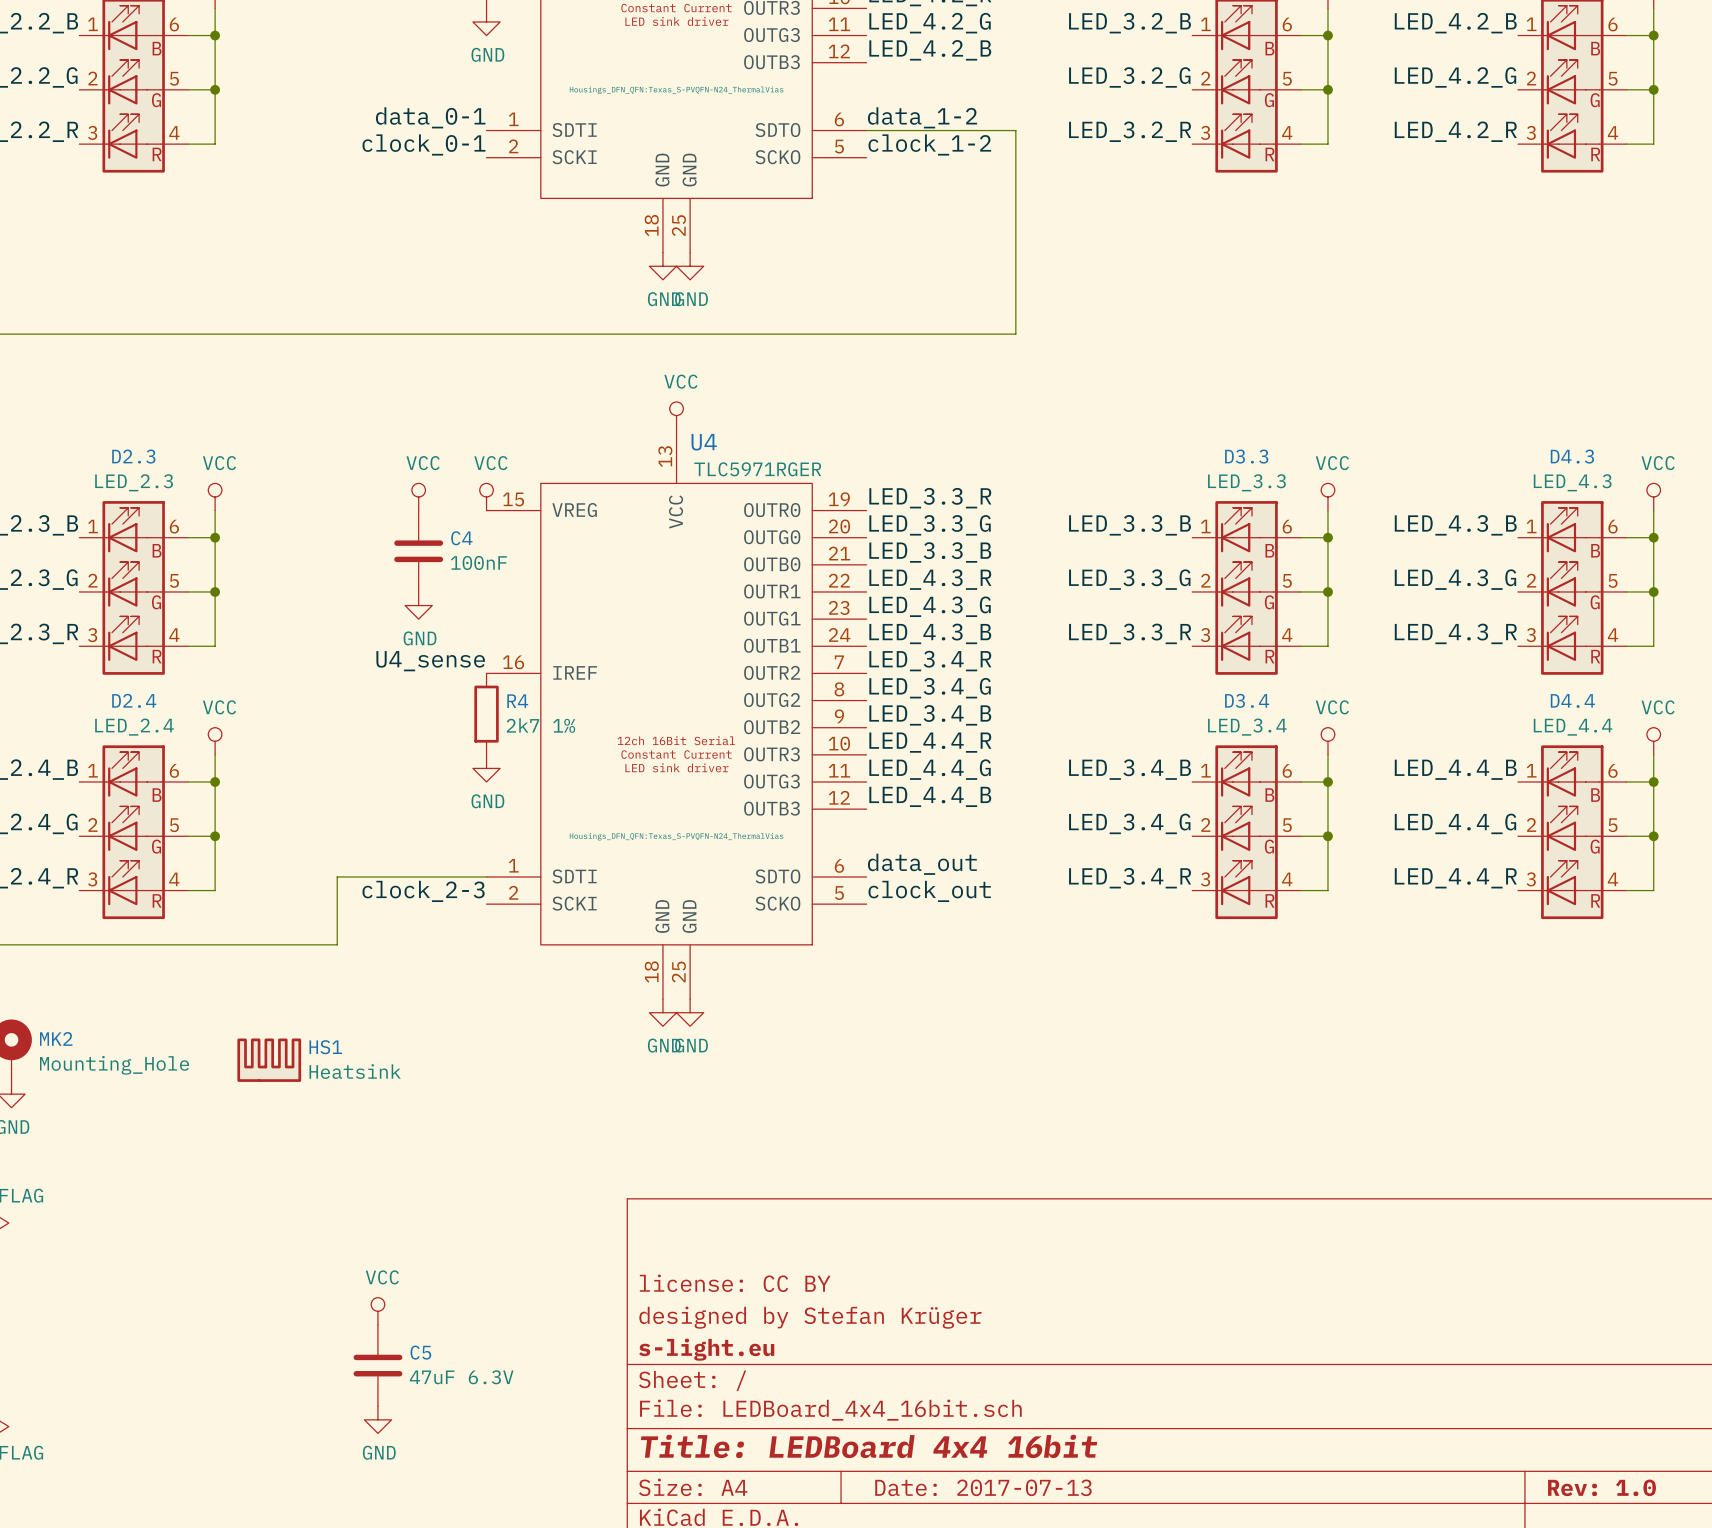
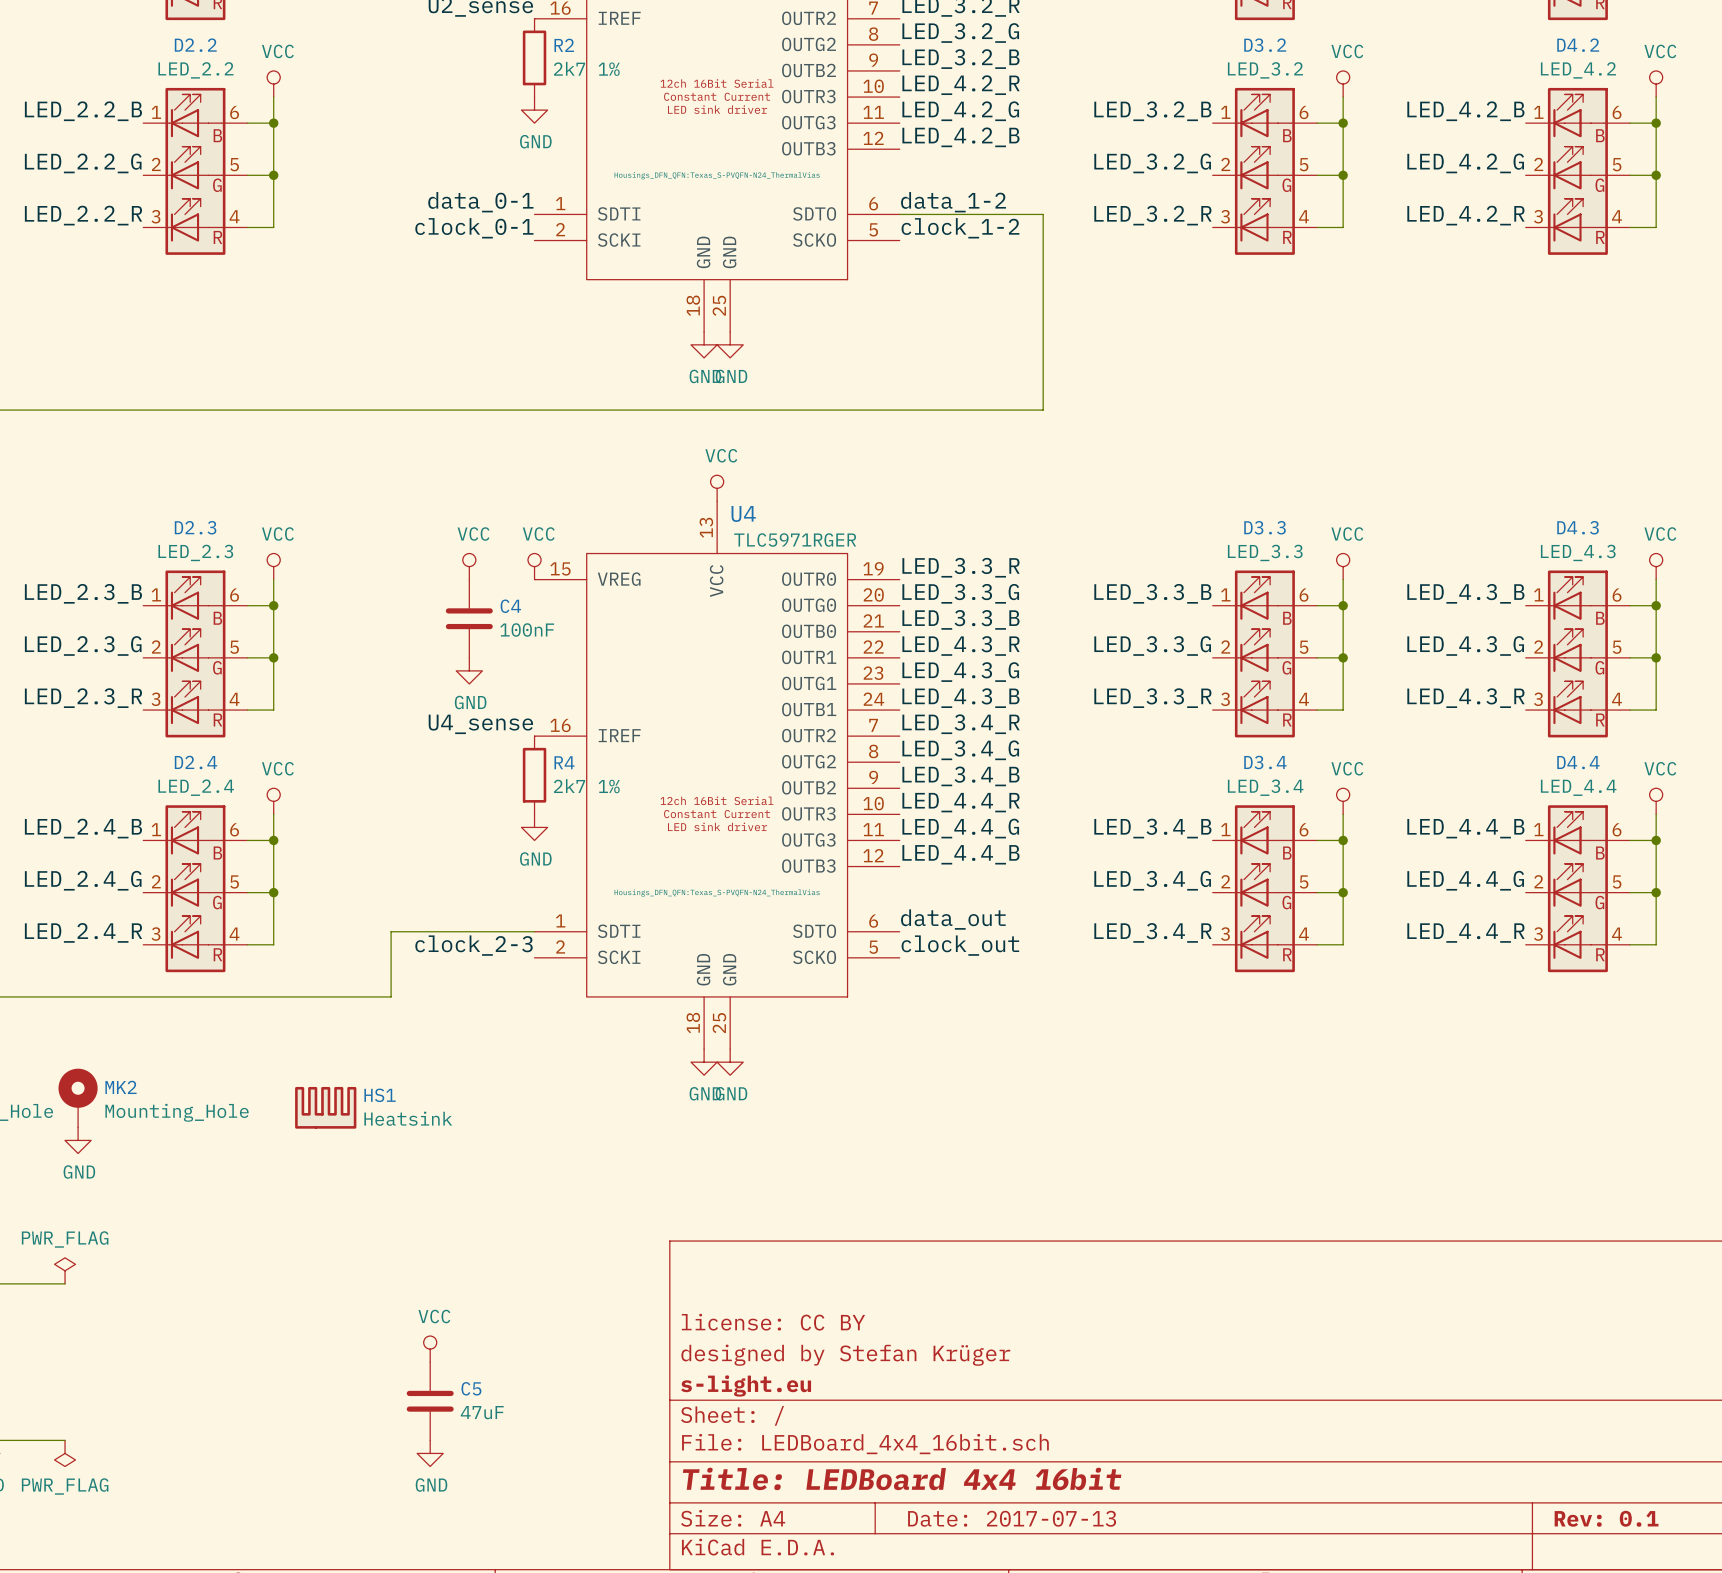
C5 value: 47uF 6.3V (461, 1377) -> 47uF (482, 1412)
title block: Rev: 1.0 (1602, 1487) -> Rev: 0.1 (1606, 1518)

